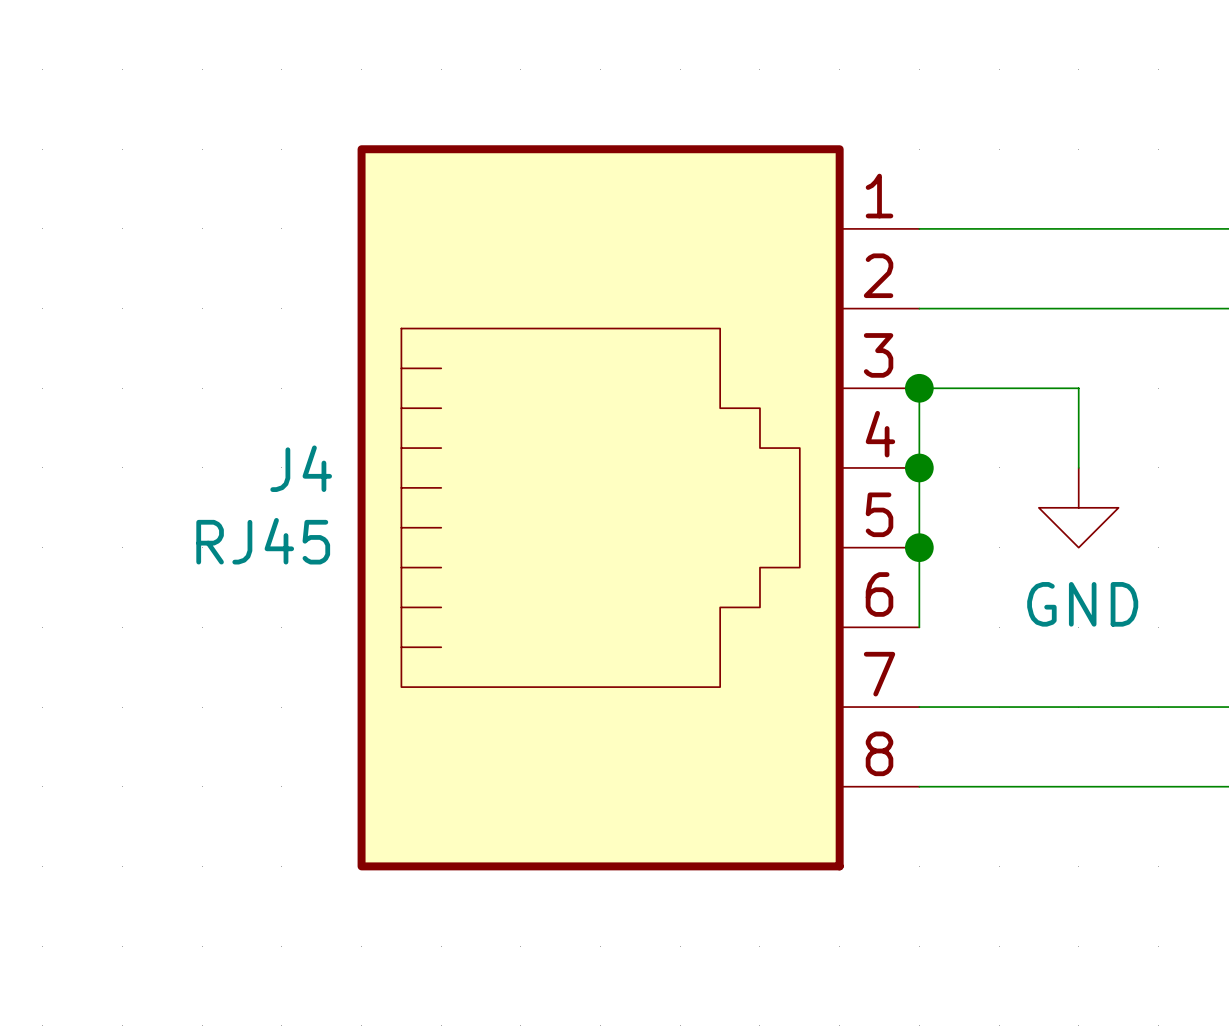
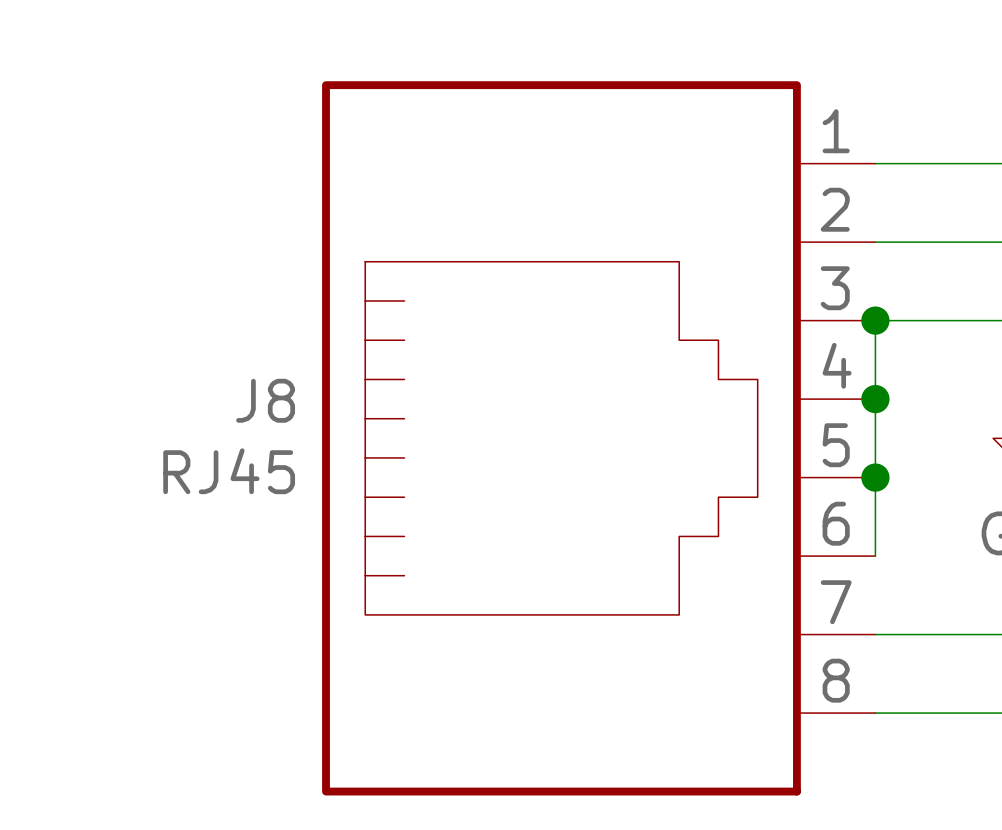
J4 name: J4 (301, 468) -> J8 (265, 400)

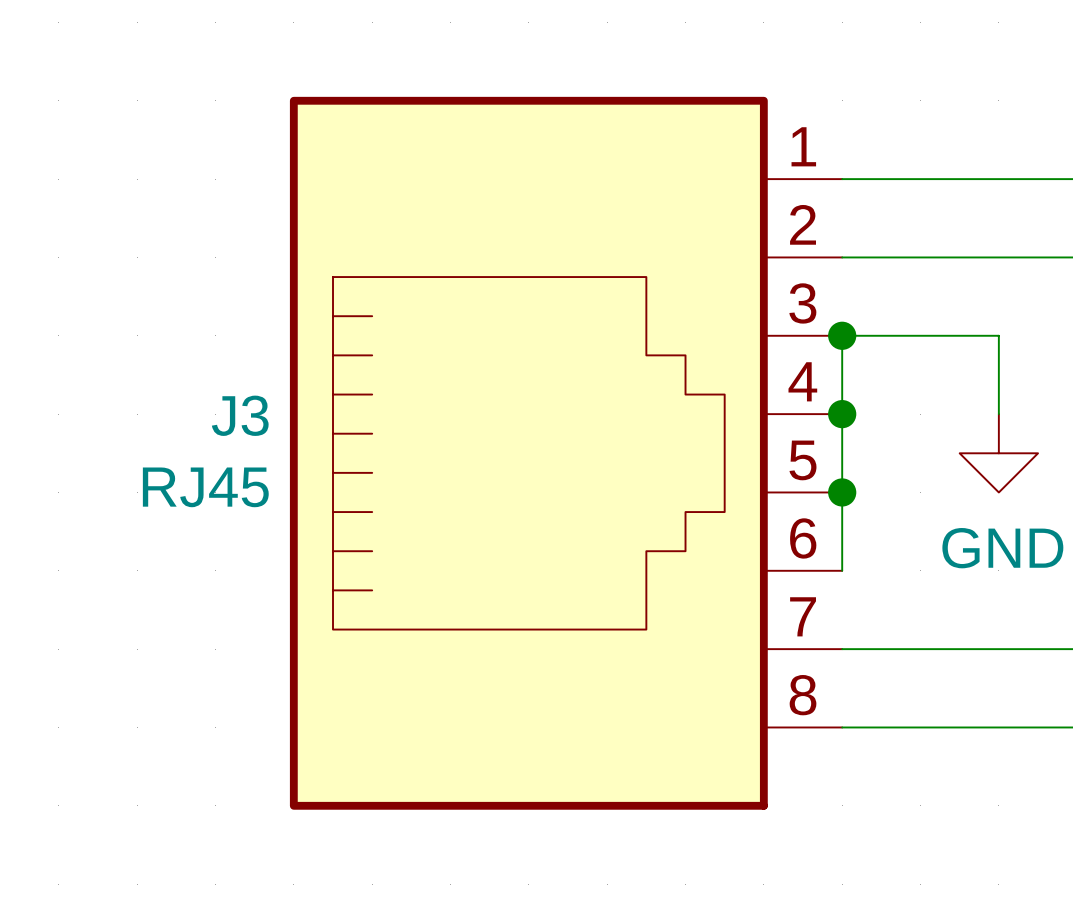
J8 name: J8 (265, 400) -> J3 (240, 415)

